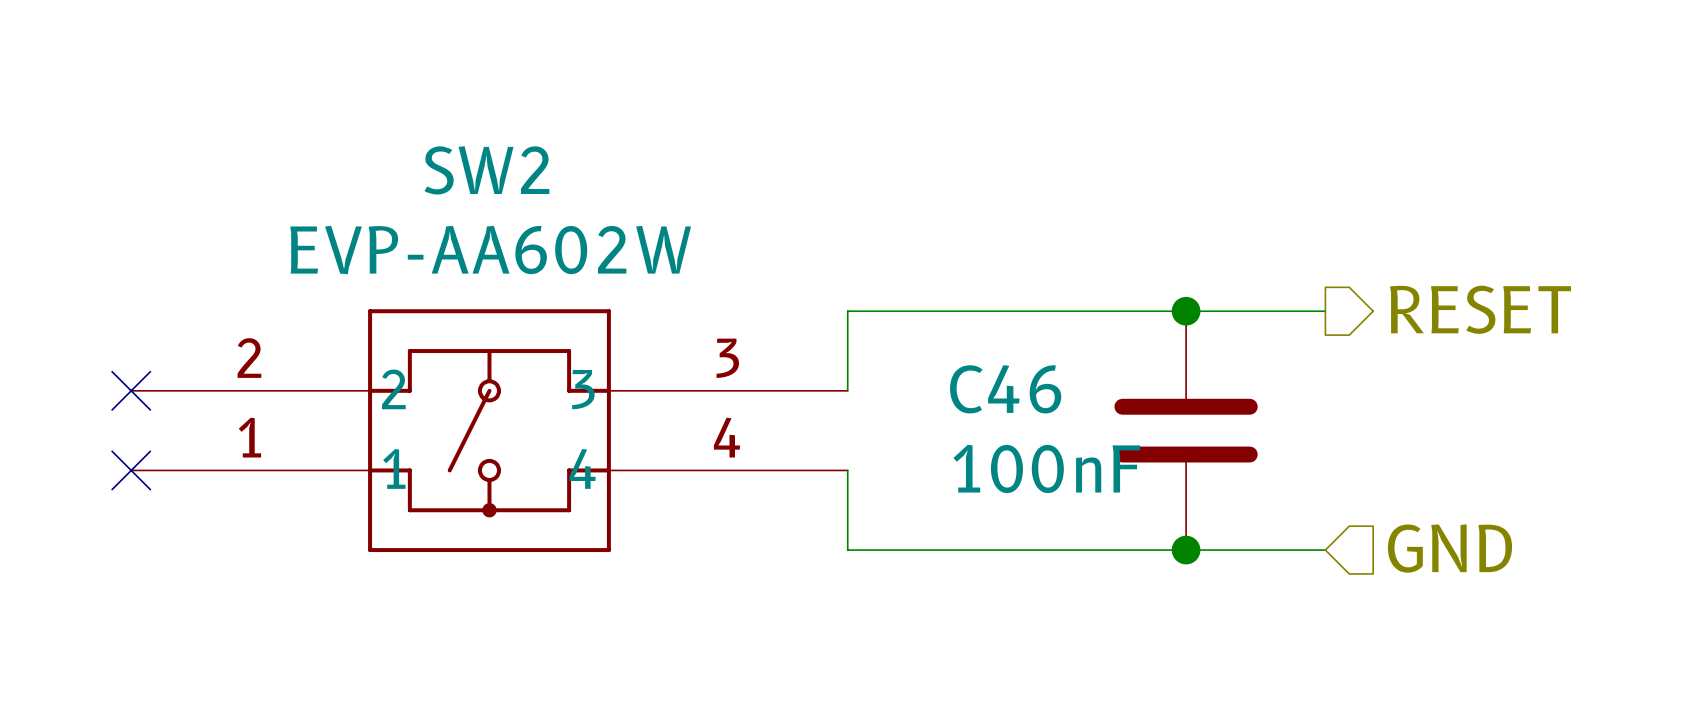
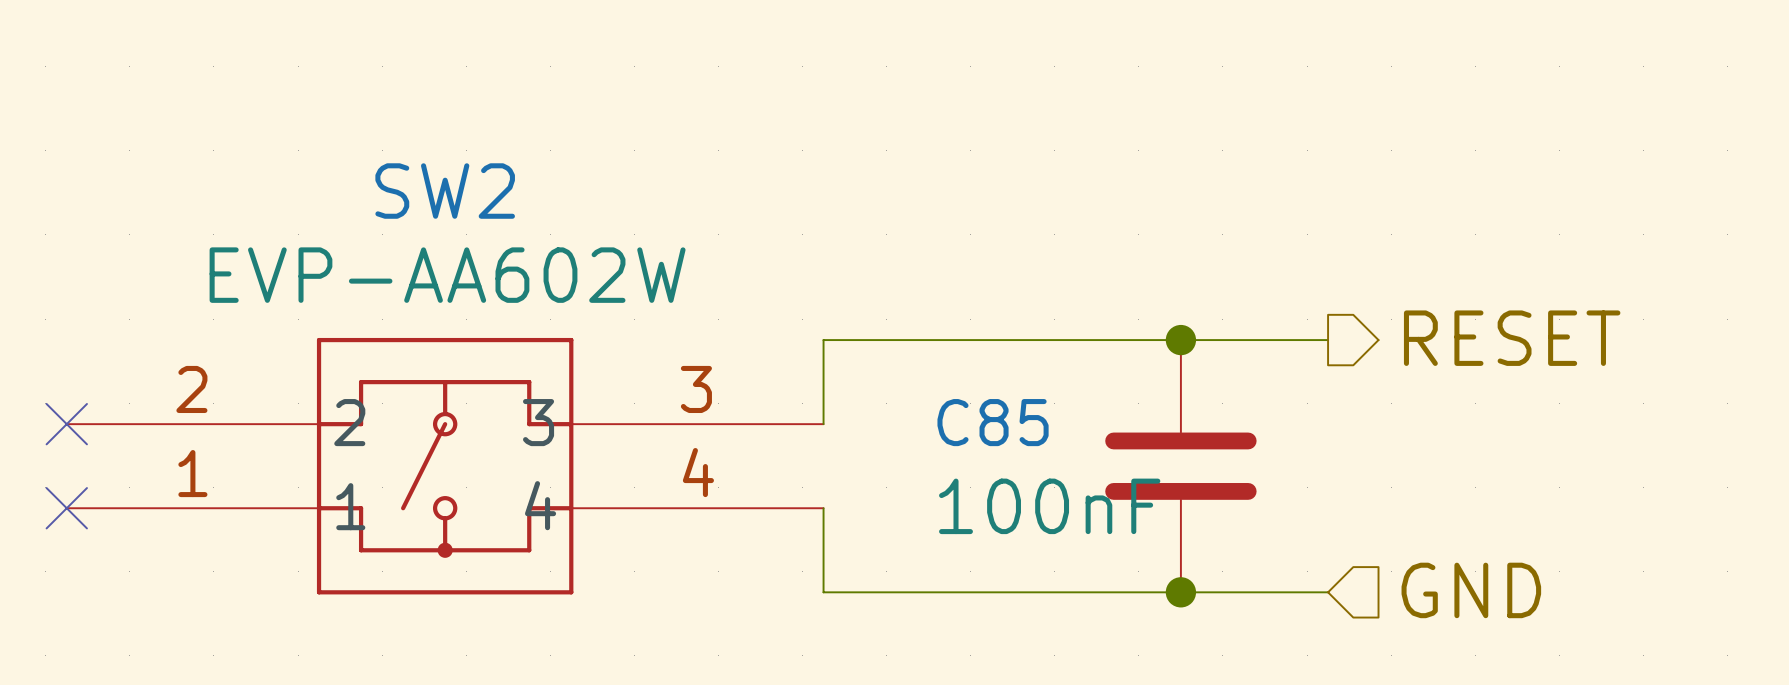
C46 name: C46 (1005, 389) -> C85 (993, 422)

